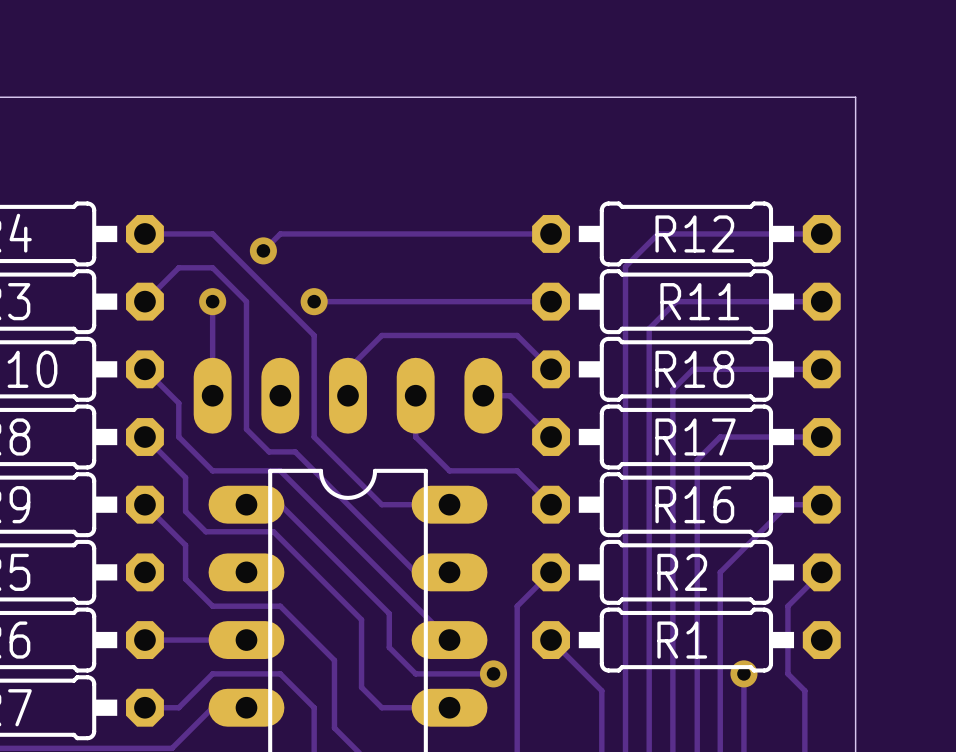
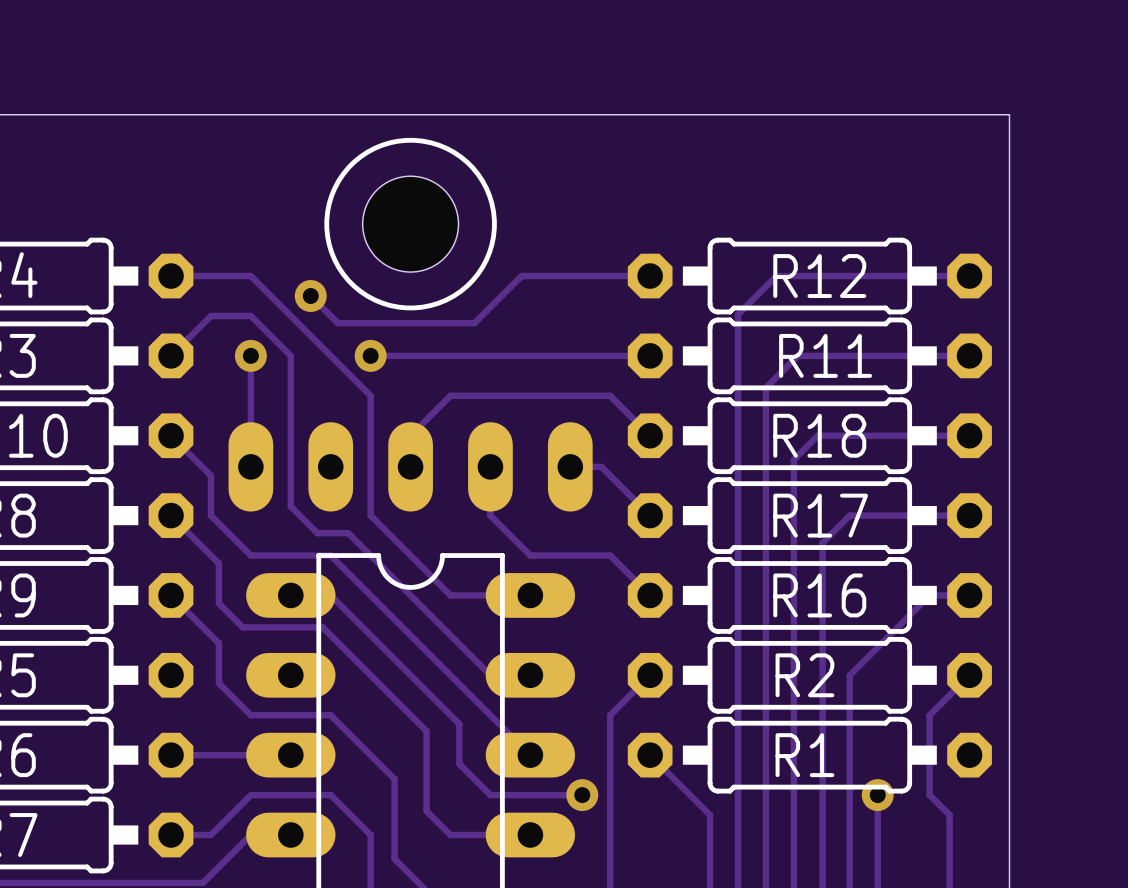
drawing: none -> [324, 137, 497, 311]
hole: none -> (410, 224)
track: (442, 233) (280, 233) (263, 250) -> (521, 276) (474, 323) (337, 323) (310, 296)

